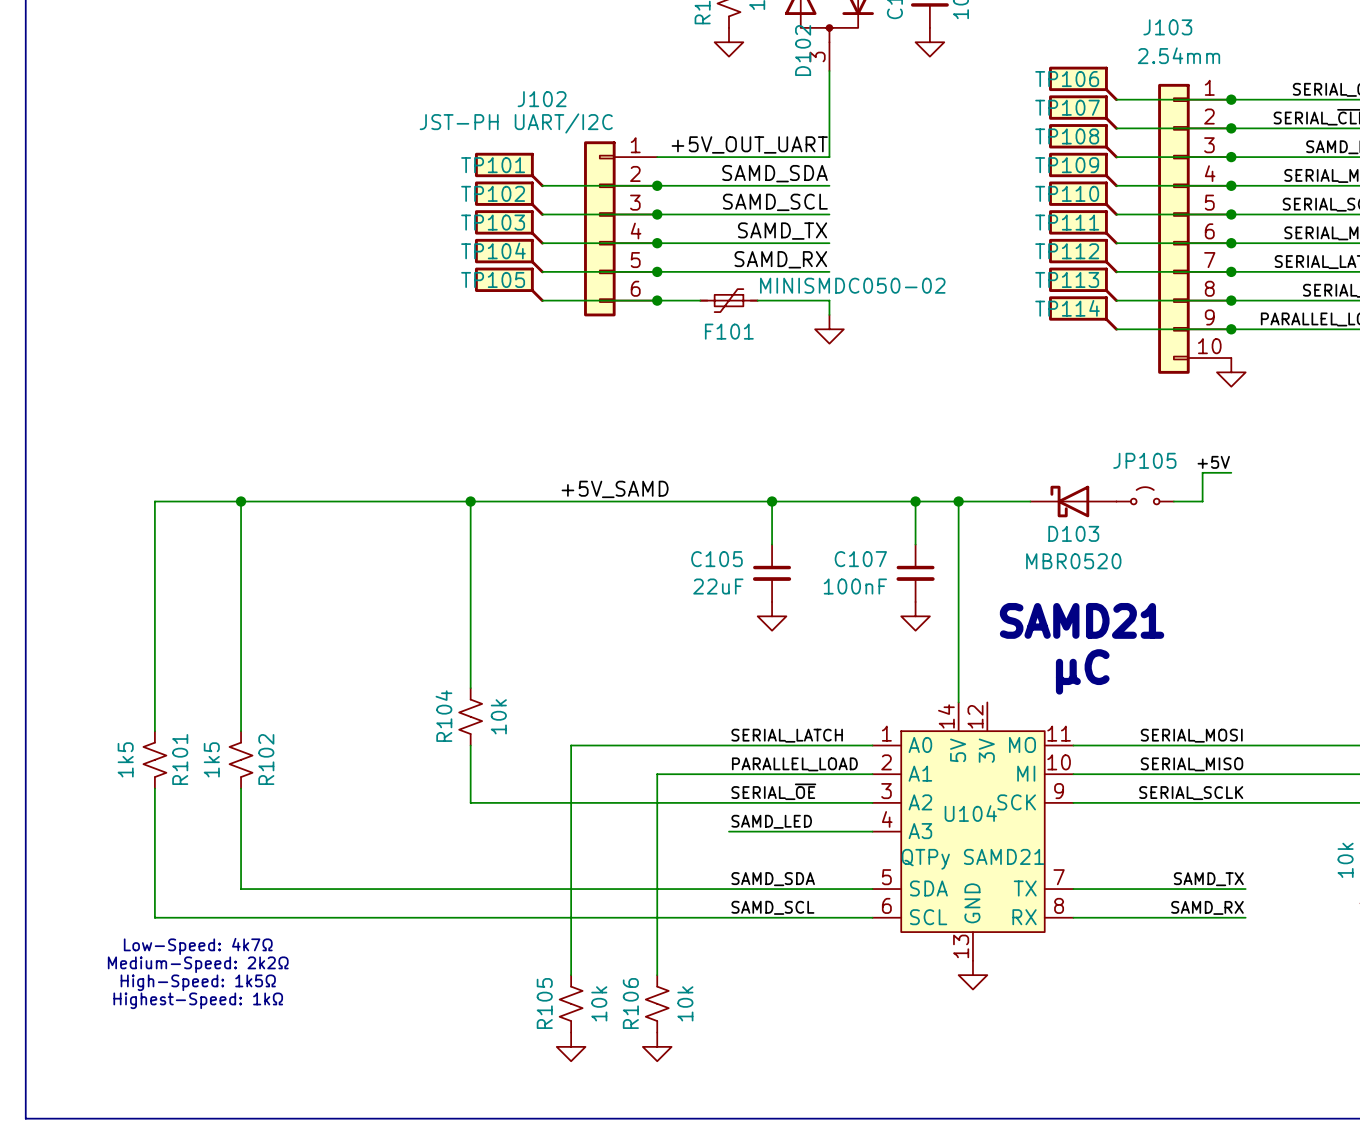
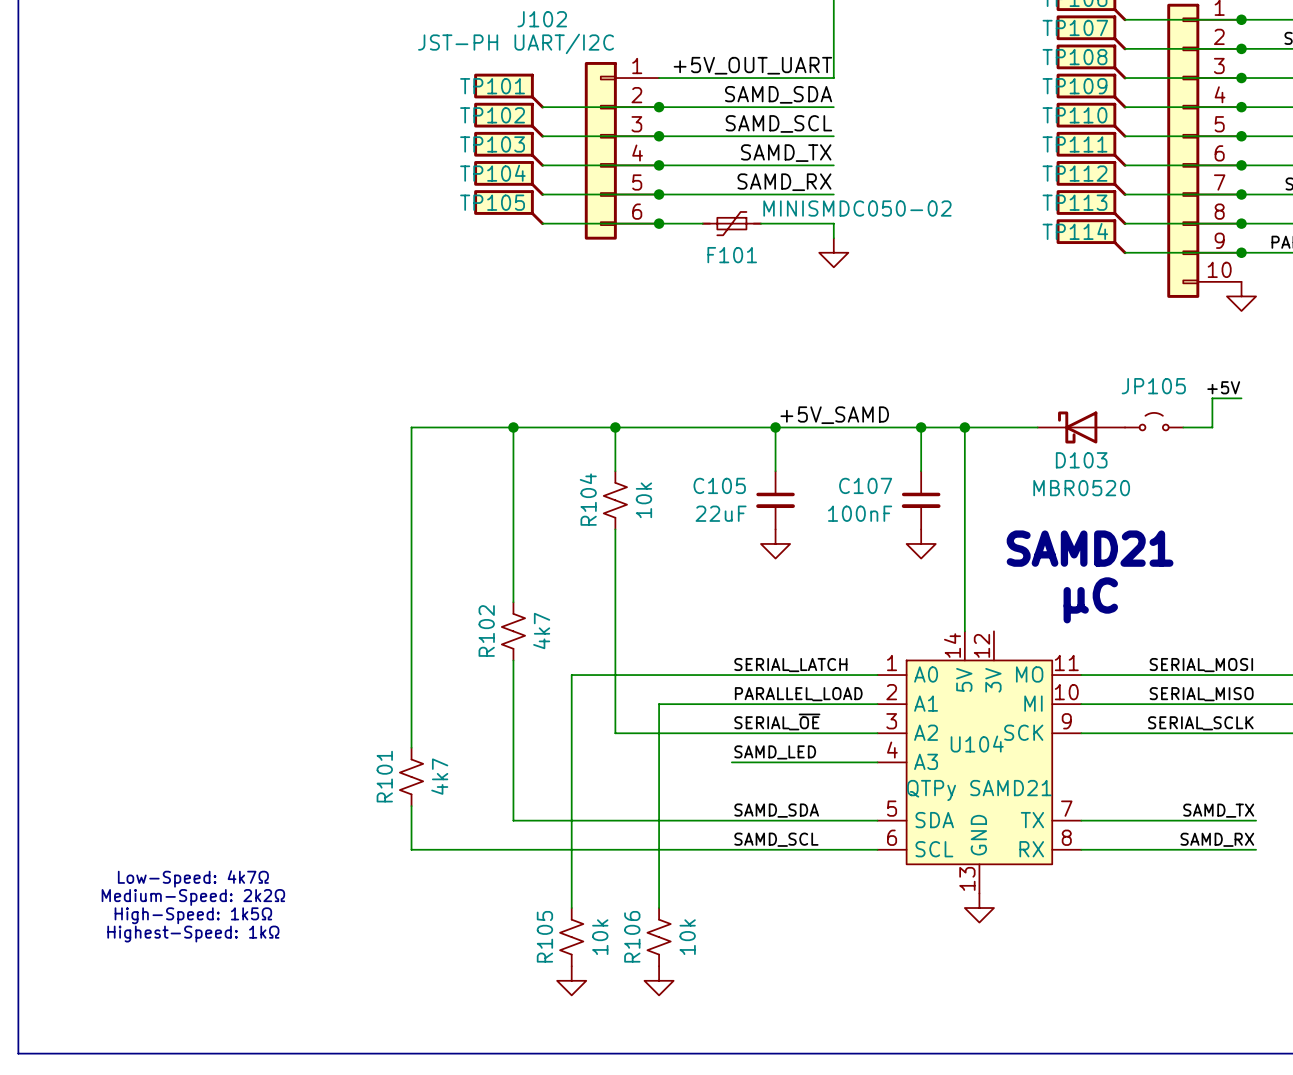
label position: +5V_SAMD (615, 489) -> +5V_SAMD (834, 415)
wire: (241, 501) (241, 731) -> none
junction: (241, 501) -> none
wire: (413, 501) (154, 501) (154, 731) -> (411, 427) (411, 747)
wire: (470, 501) (470, 688) -> none
junction position: (470, 501) -> (513, 427)
wire: none -> (513, 427) (513, 602)
wire: none -> (615, 427) (615, 471)
junction: none -> (615, 427)
R104 position: (470, 716) -> (615, 500)
wire: (470, 745) (470, 802) (614, 802) -> (615, 529) (615, 733)
R101 value: 1k5 (125, 759) -> 4k7 (439, 776)
R101 flip: as is (154, 759) -> left-right (411, 776)
R101 position: (154, 759) -> (411, 776)
R102 value: 1k5 (211, 759) -> 4k7 (541, 631)
R102 flip: as is (241, 759) -> left-right (513, 631)
R102 position: (241, 759) -> (513, 631)
wire: (154, 788) (154, 917) (413, 917) -> (411, 806) (411, 849)
wire: (241, 788) (241, 889) (513, 889) -> (513, 660) (513, 820)

